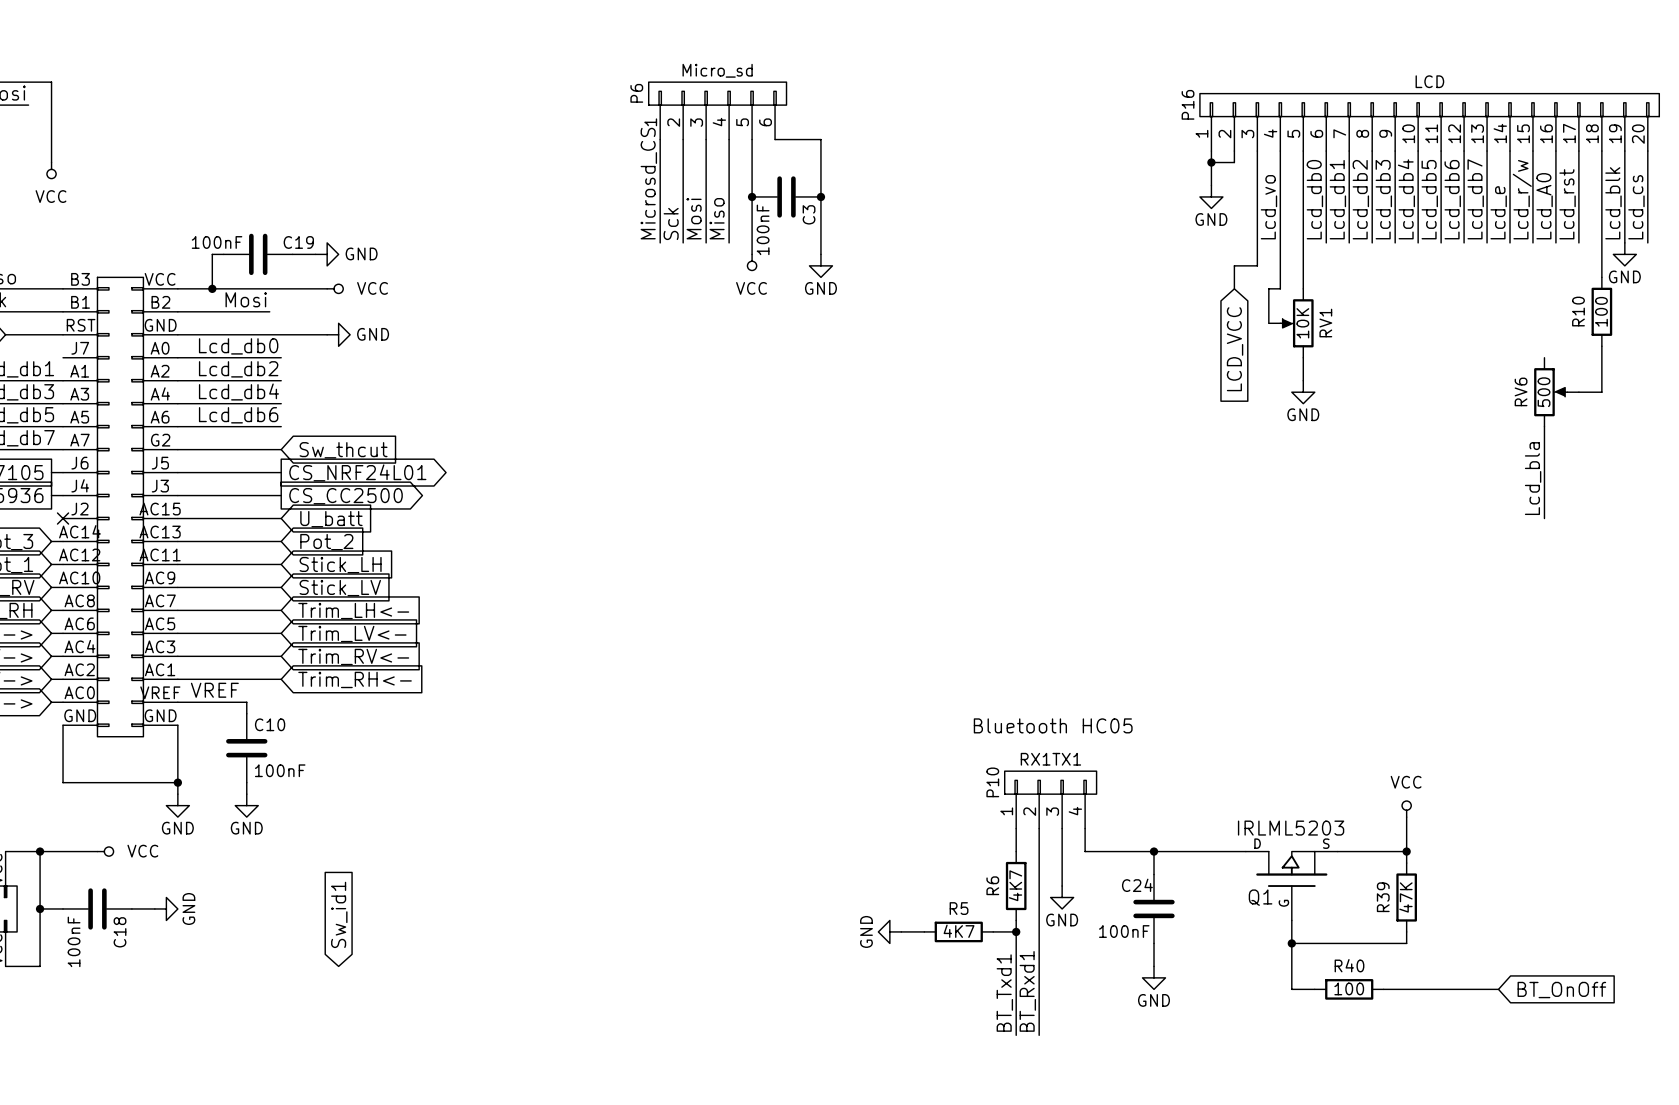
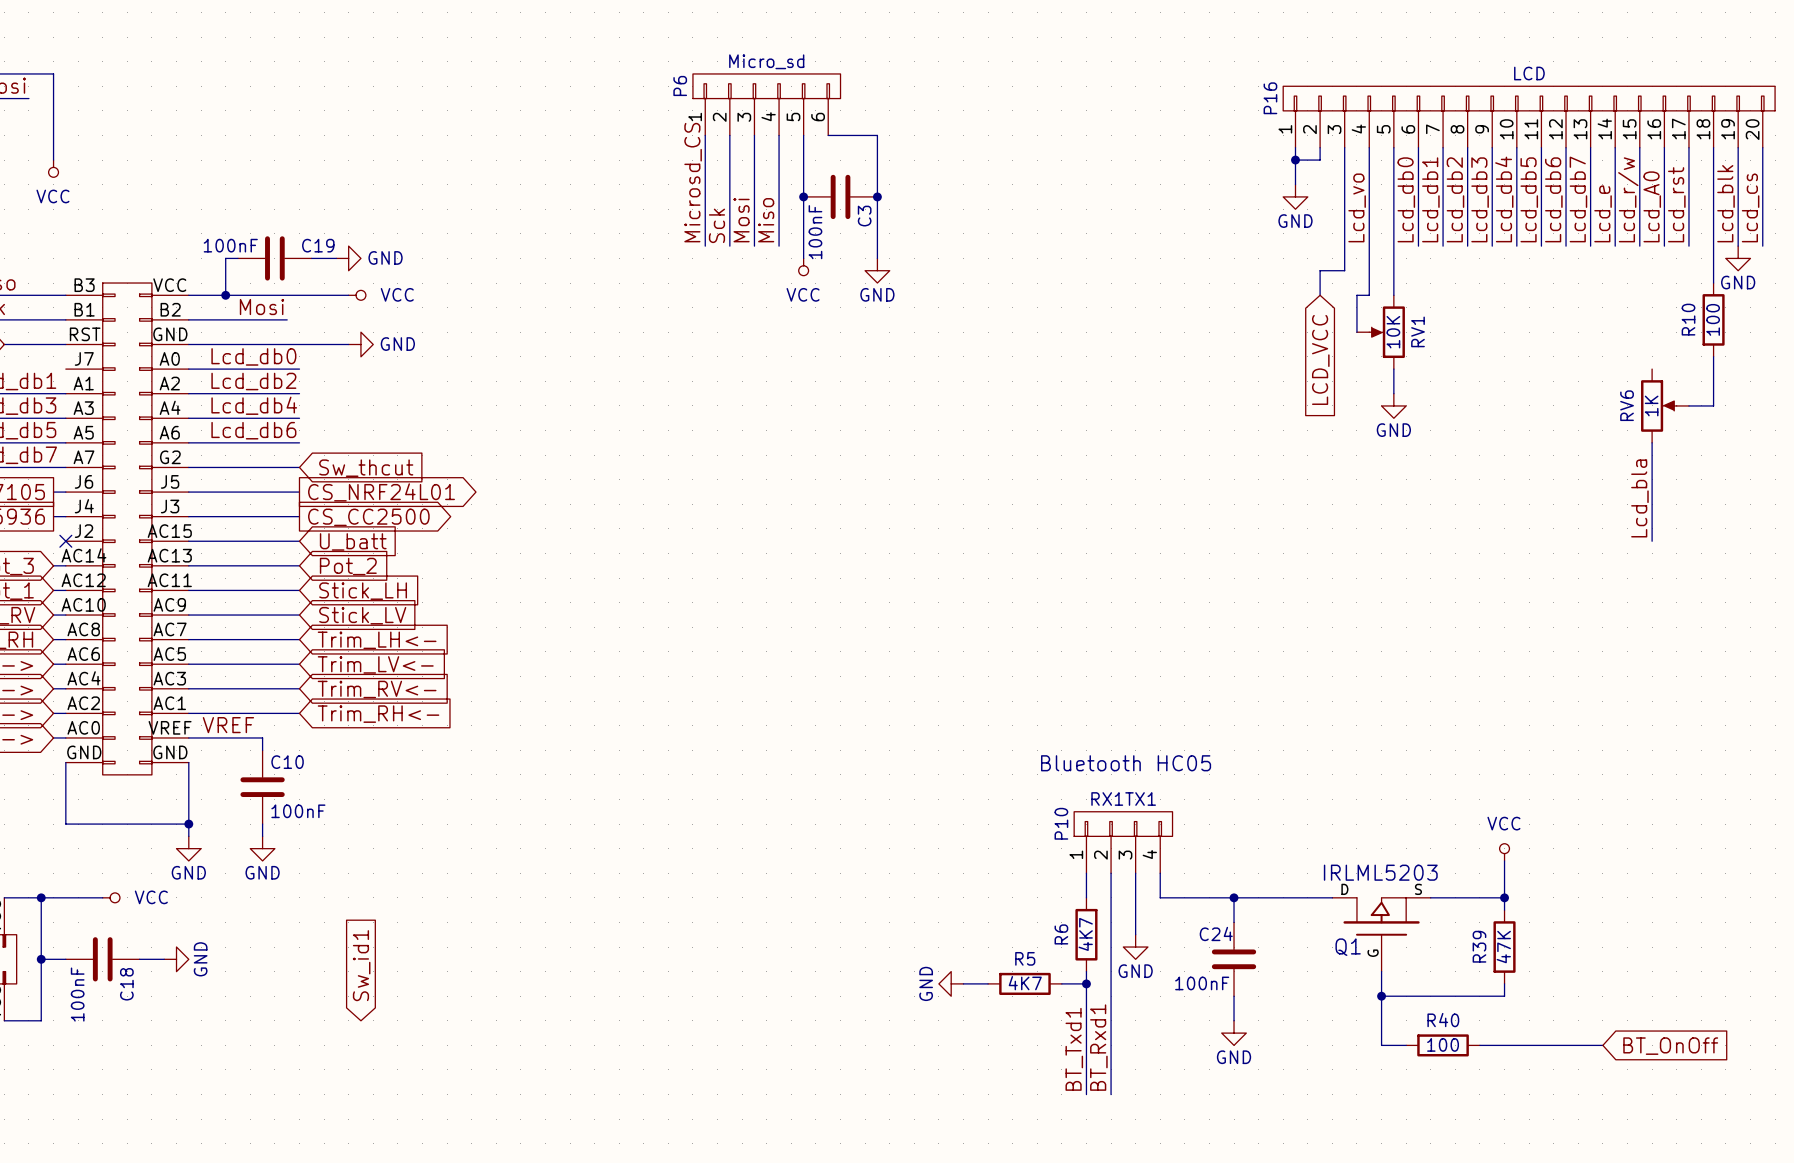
RV6 value: 500 (1544, 392) -> 1K (1651, 405)

